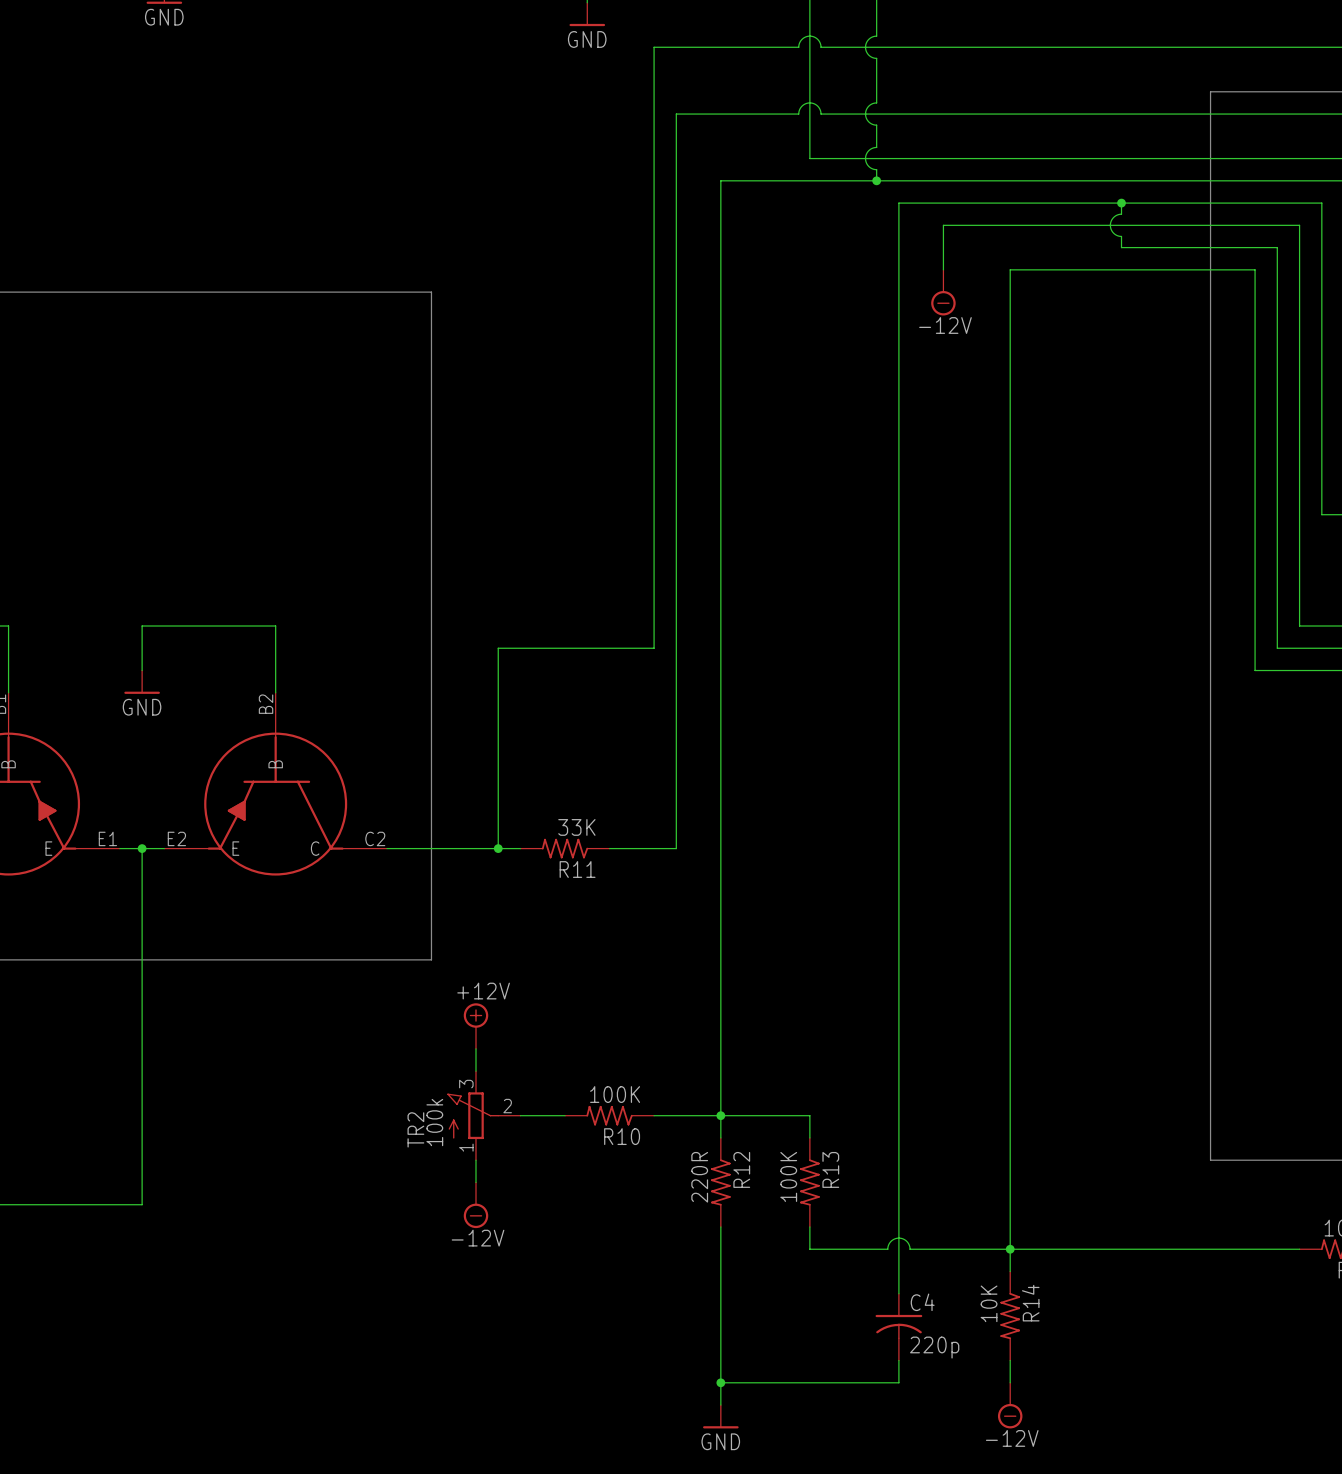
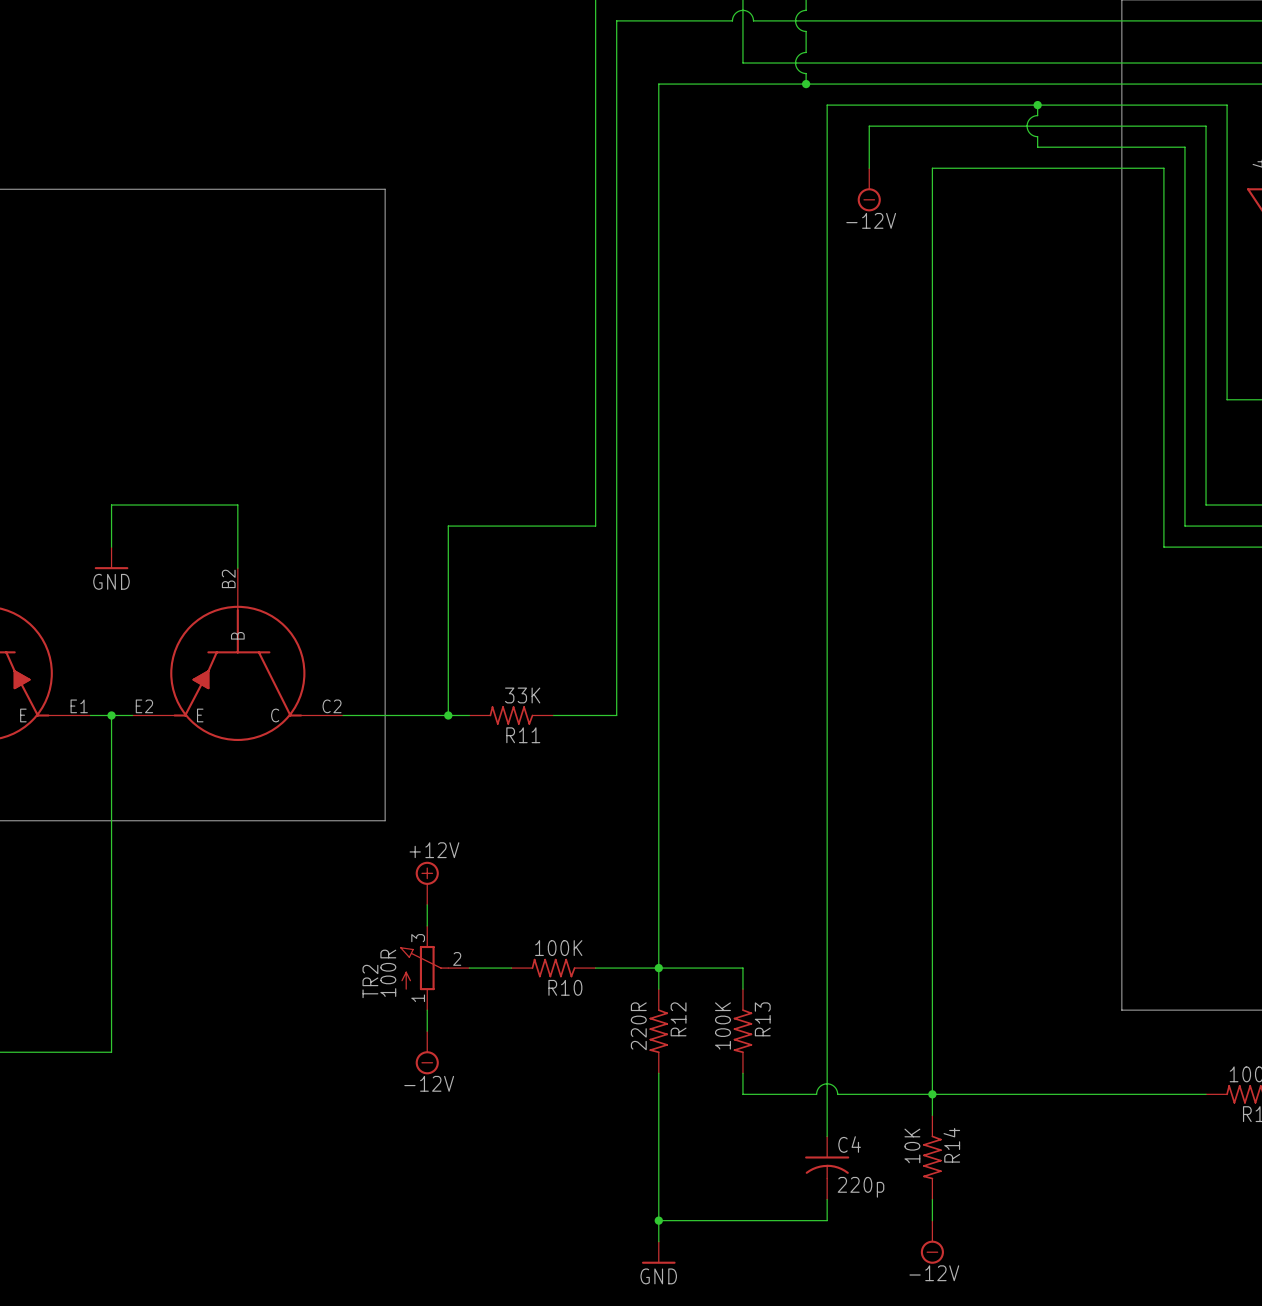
TR2 value: 100k (434, 1122) -> 100R (388, 973)

